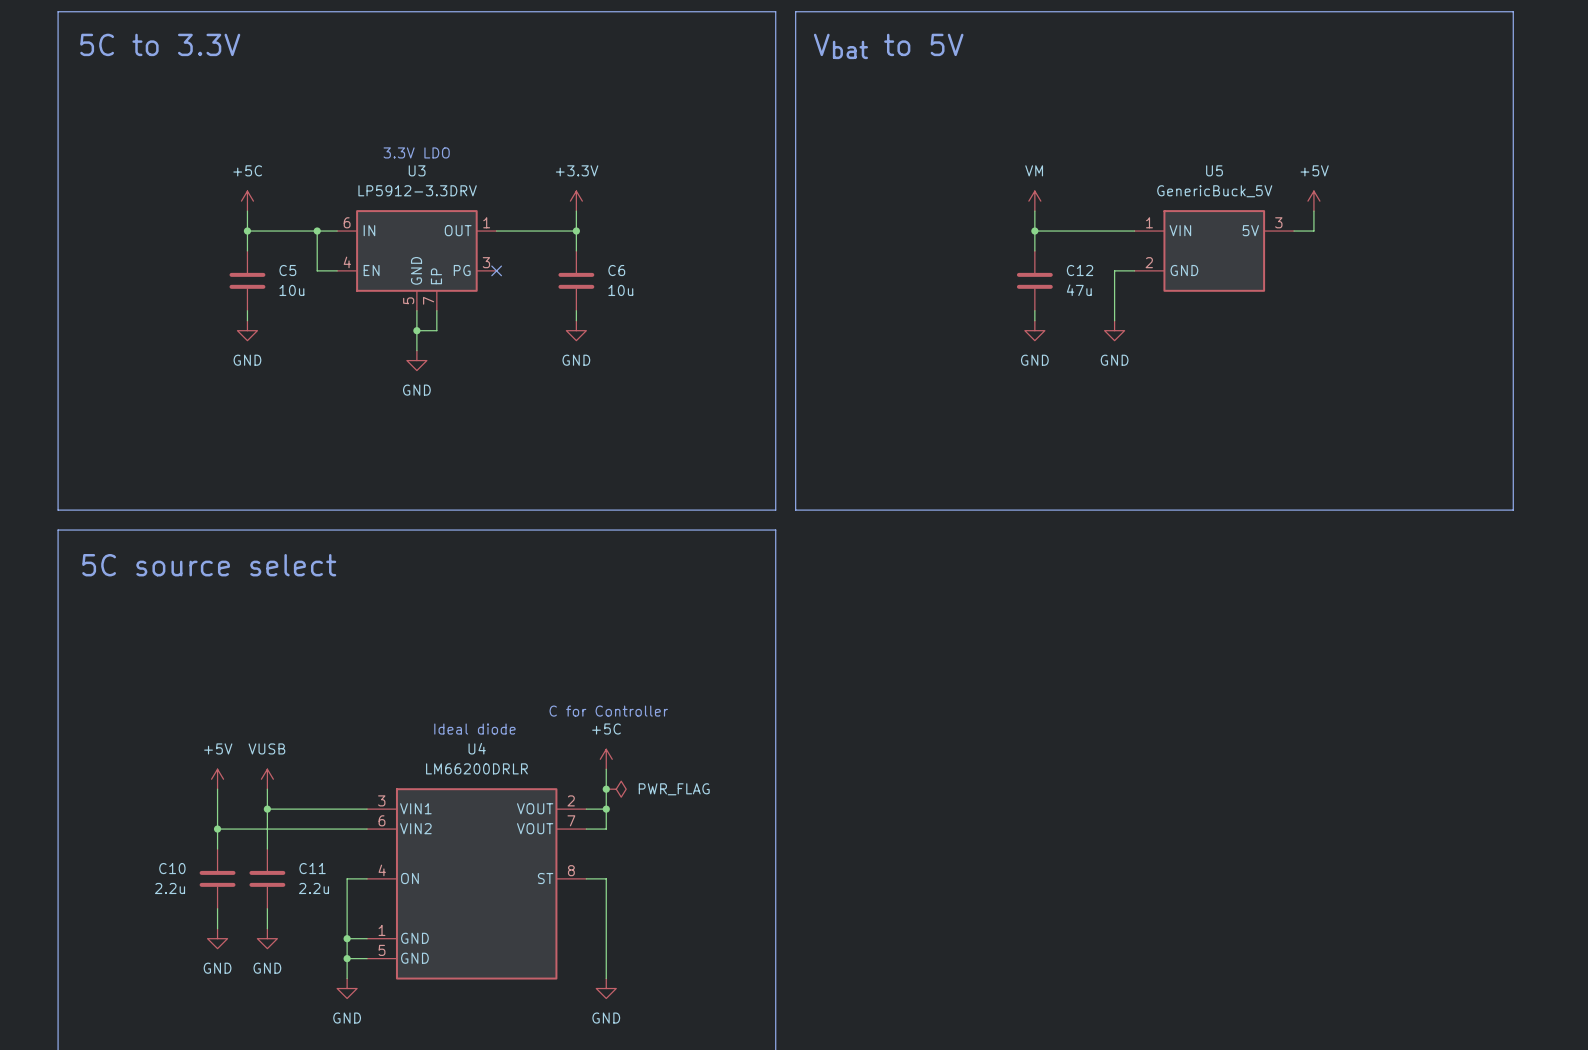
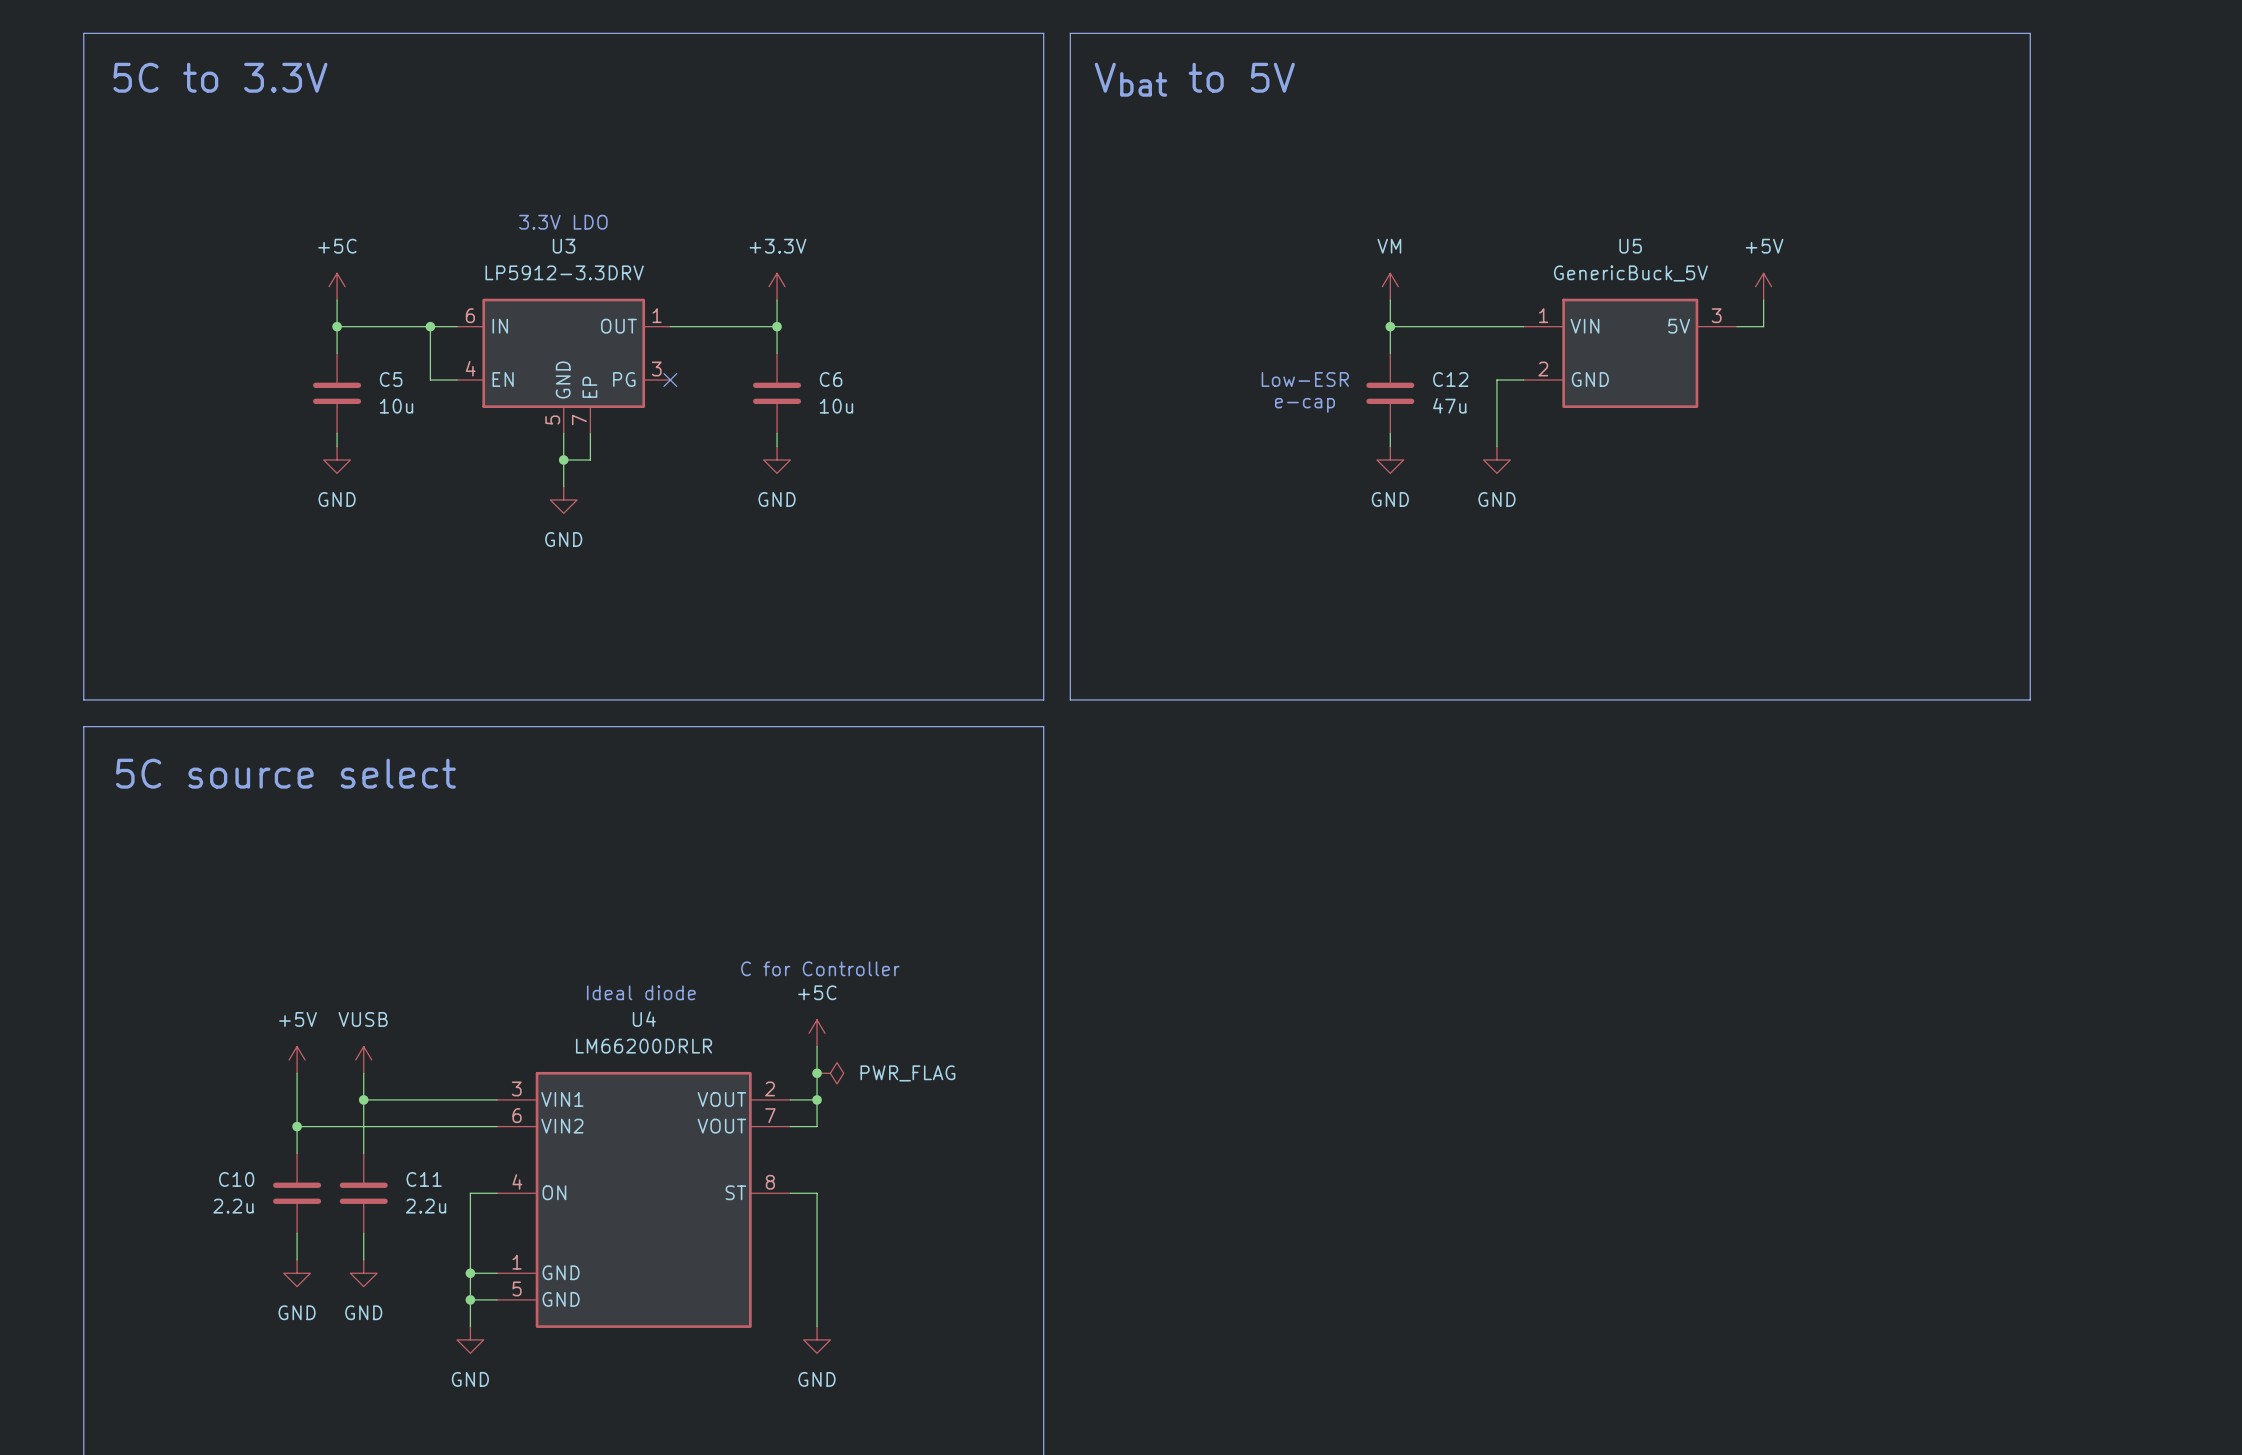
text: none -> Low-ESR (1305, 379)
text: none -> e-cap (1304, 405)

